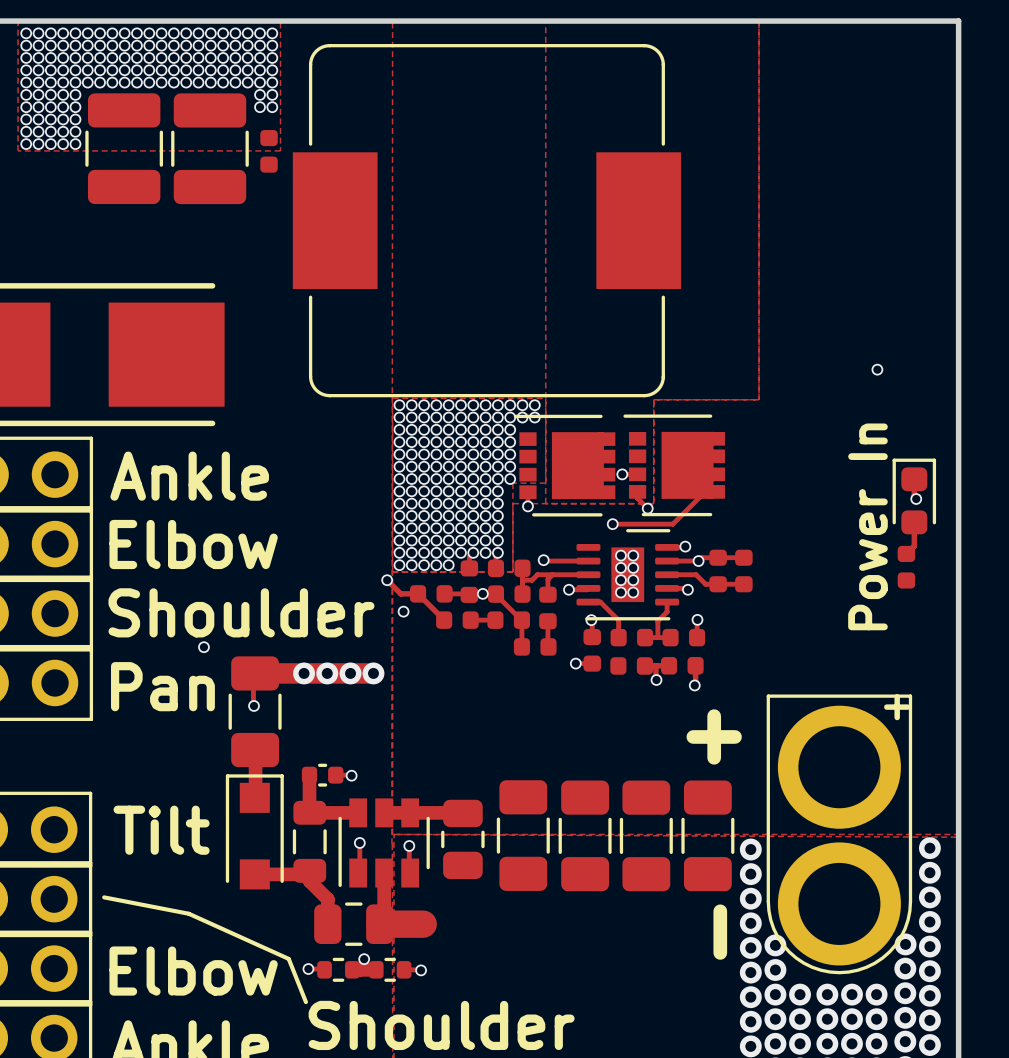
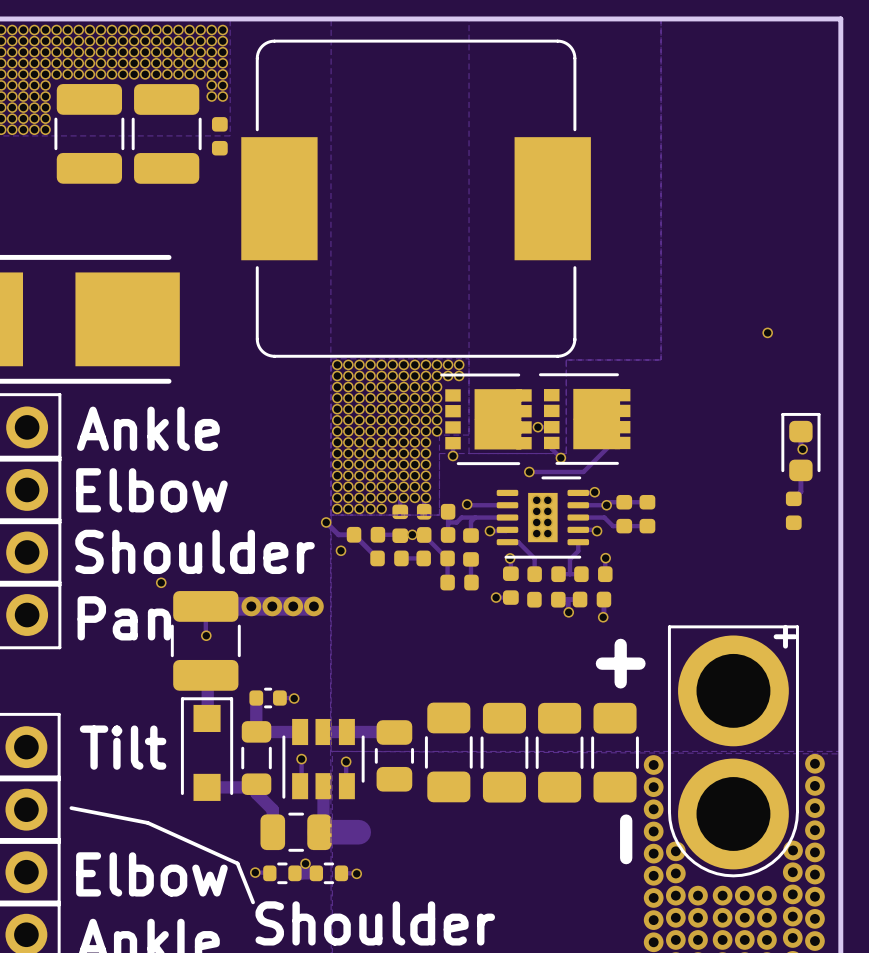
text: Power In (867, 526) -> none
part footprint: [228, 656, 282, 768] -> [170, 591, 241, 691]

